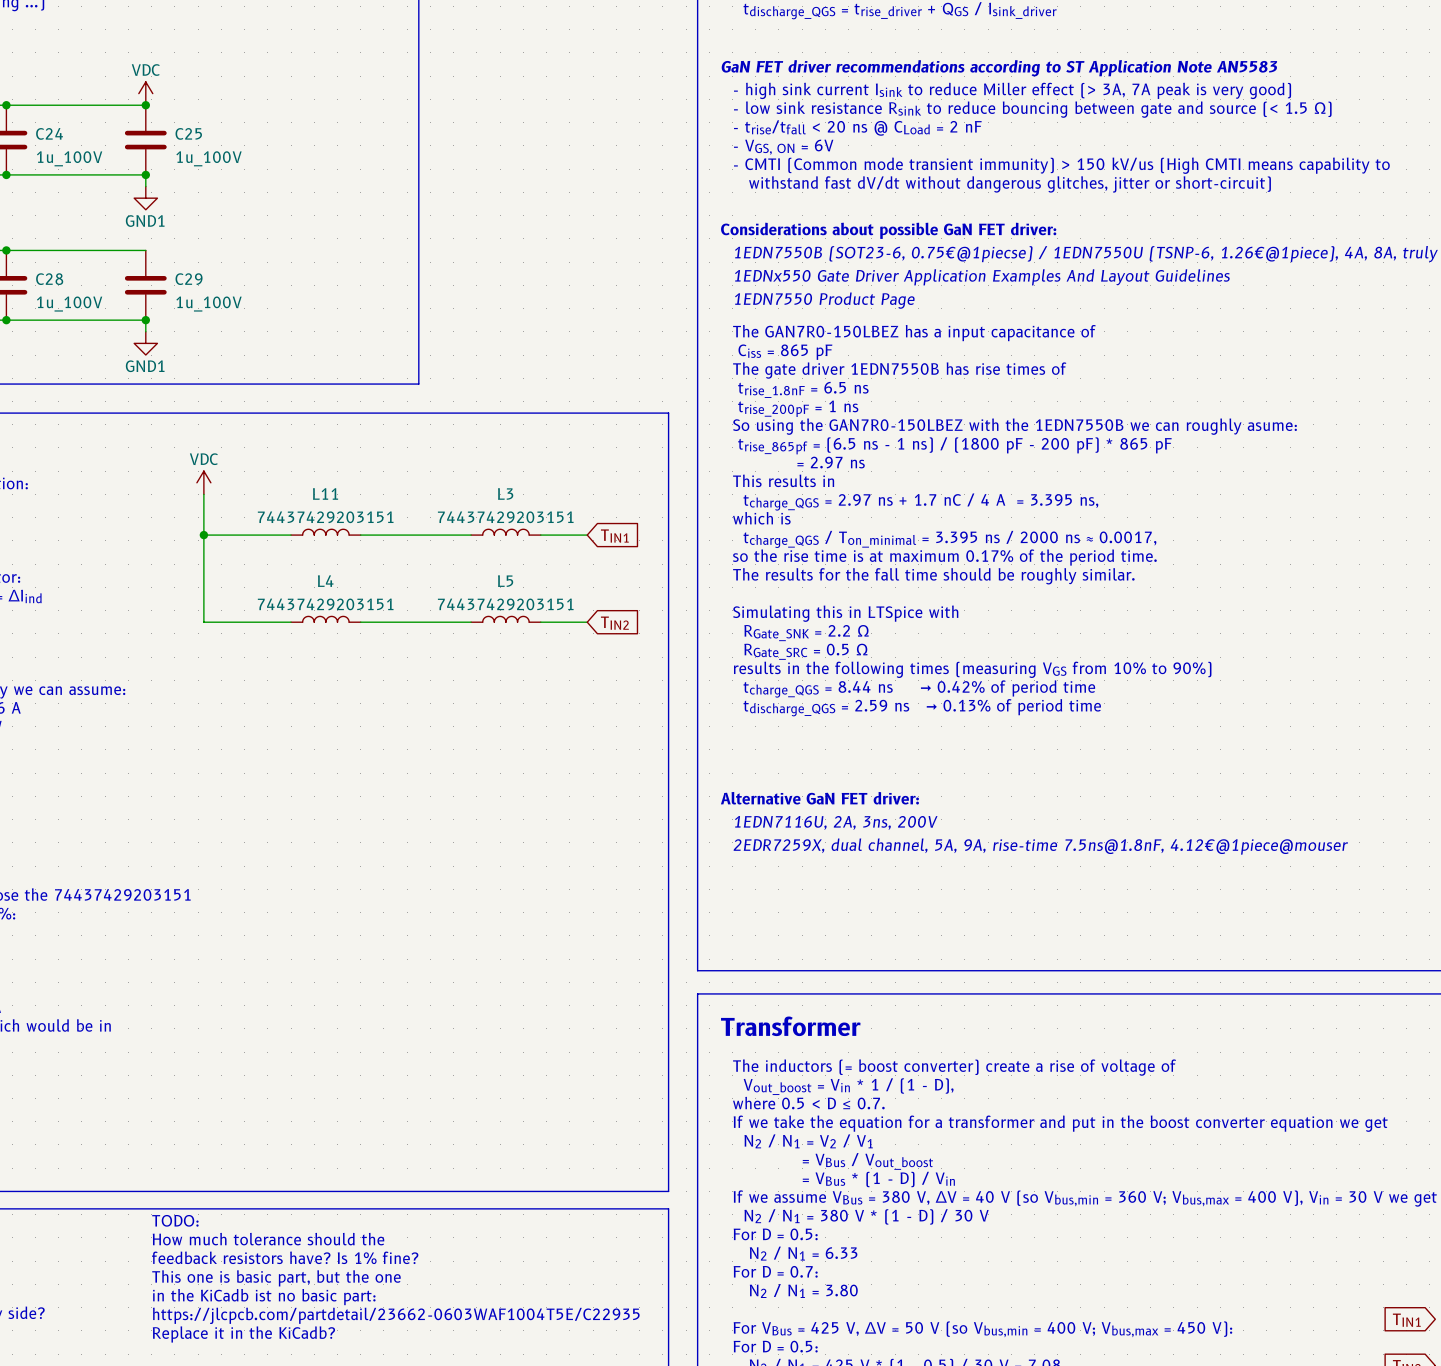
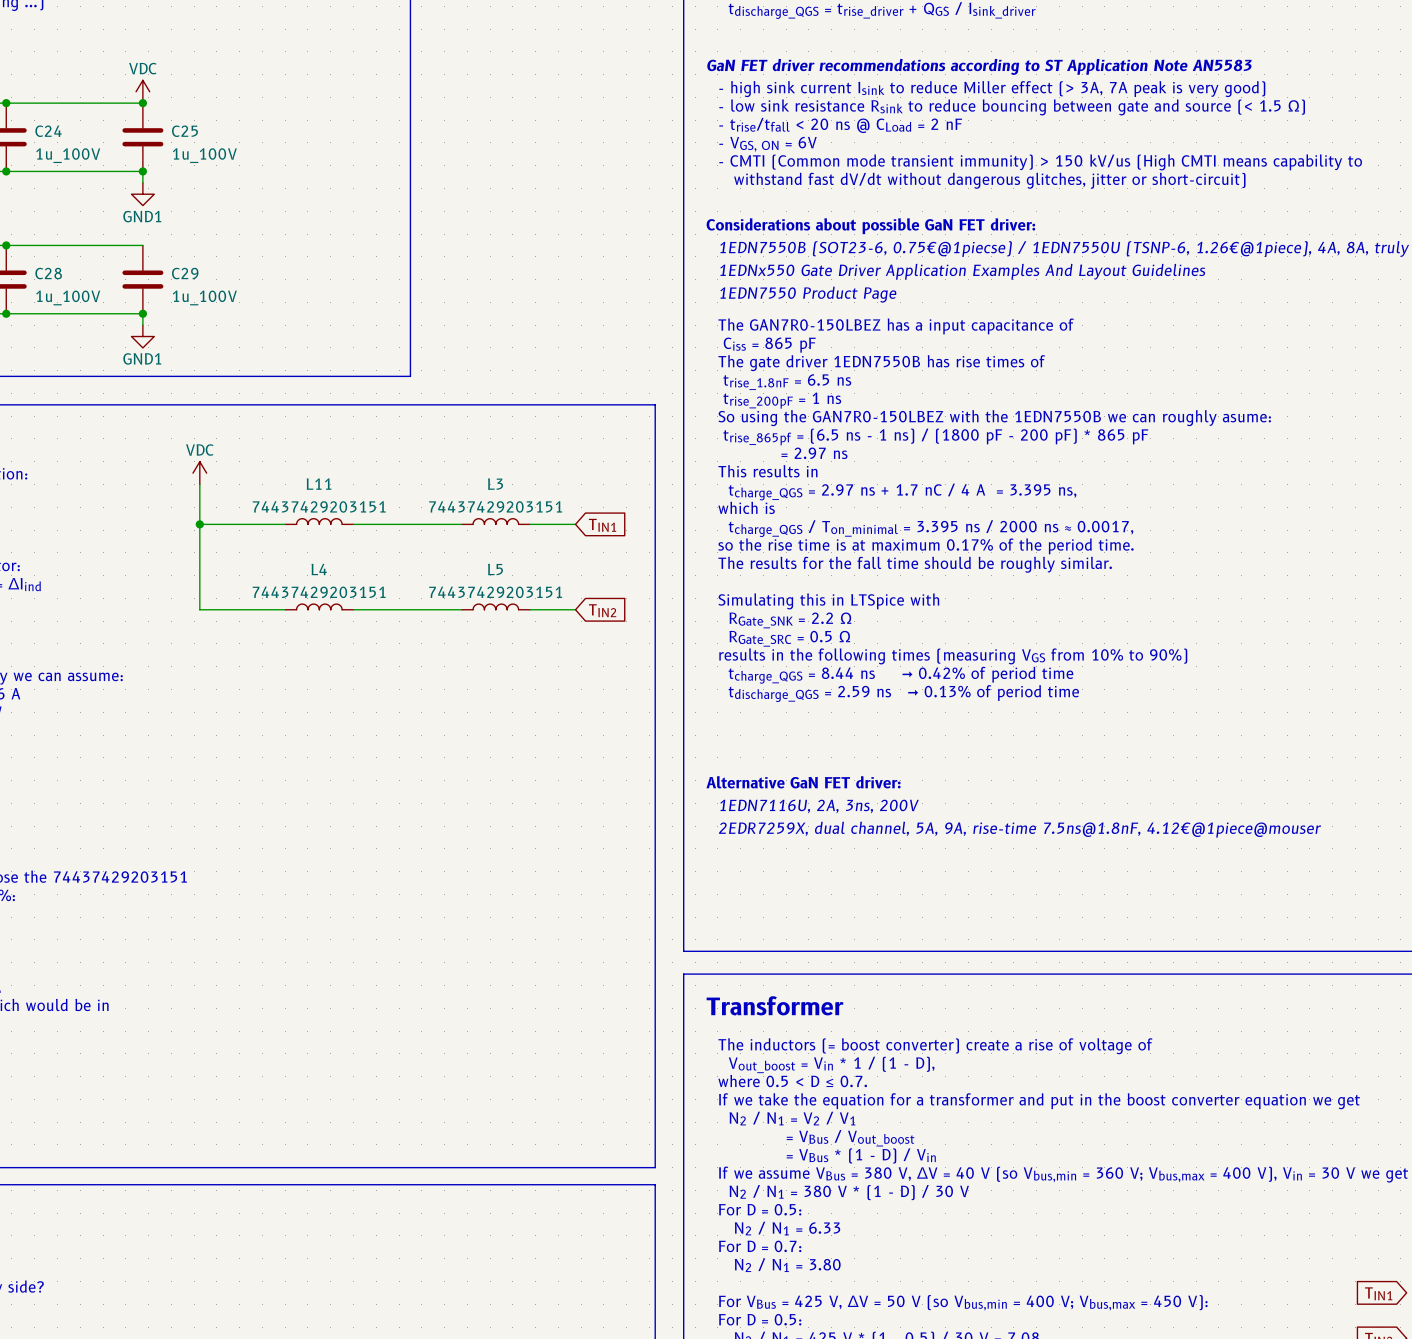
text: TODO: (175, 1220) -> none
text: How much tolerance should the (268, 1239) -> none
text: feedback resistors have? Is 1% fine? (285, 1257) -> none
text: This one is basic part, but the one (276, 1278) -> none
text: in the KiCadb ist no basic part: (264, 1297) -> none
text: https://jlcpcb.com/partdetail/23662-0603WAF1004T5E/C22935 (396, 1315) -> none
text: Replace it in the KiCadb? (243, 1334) -> none

